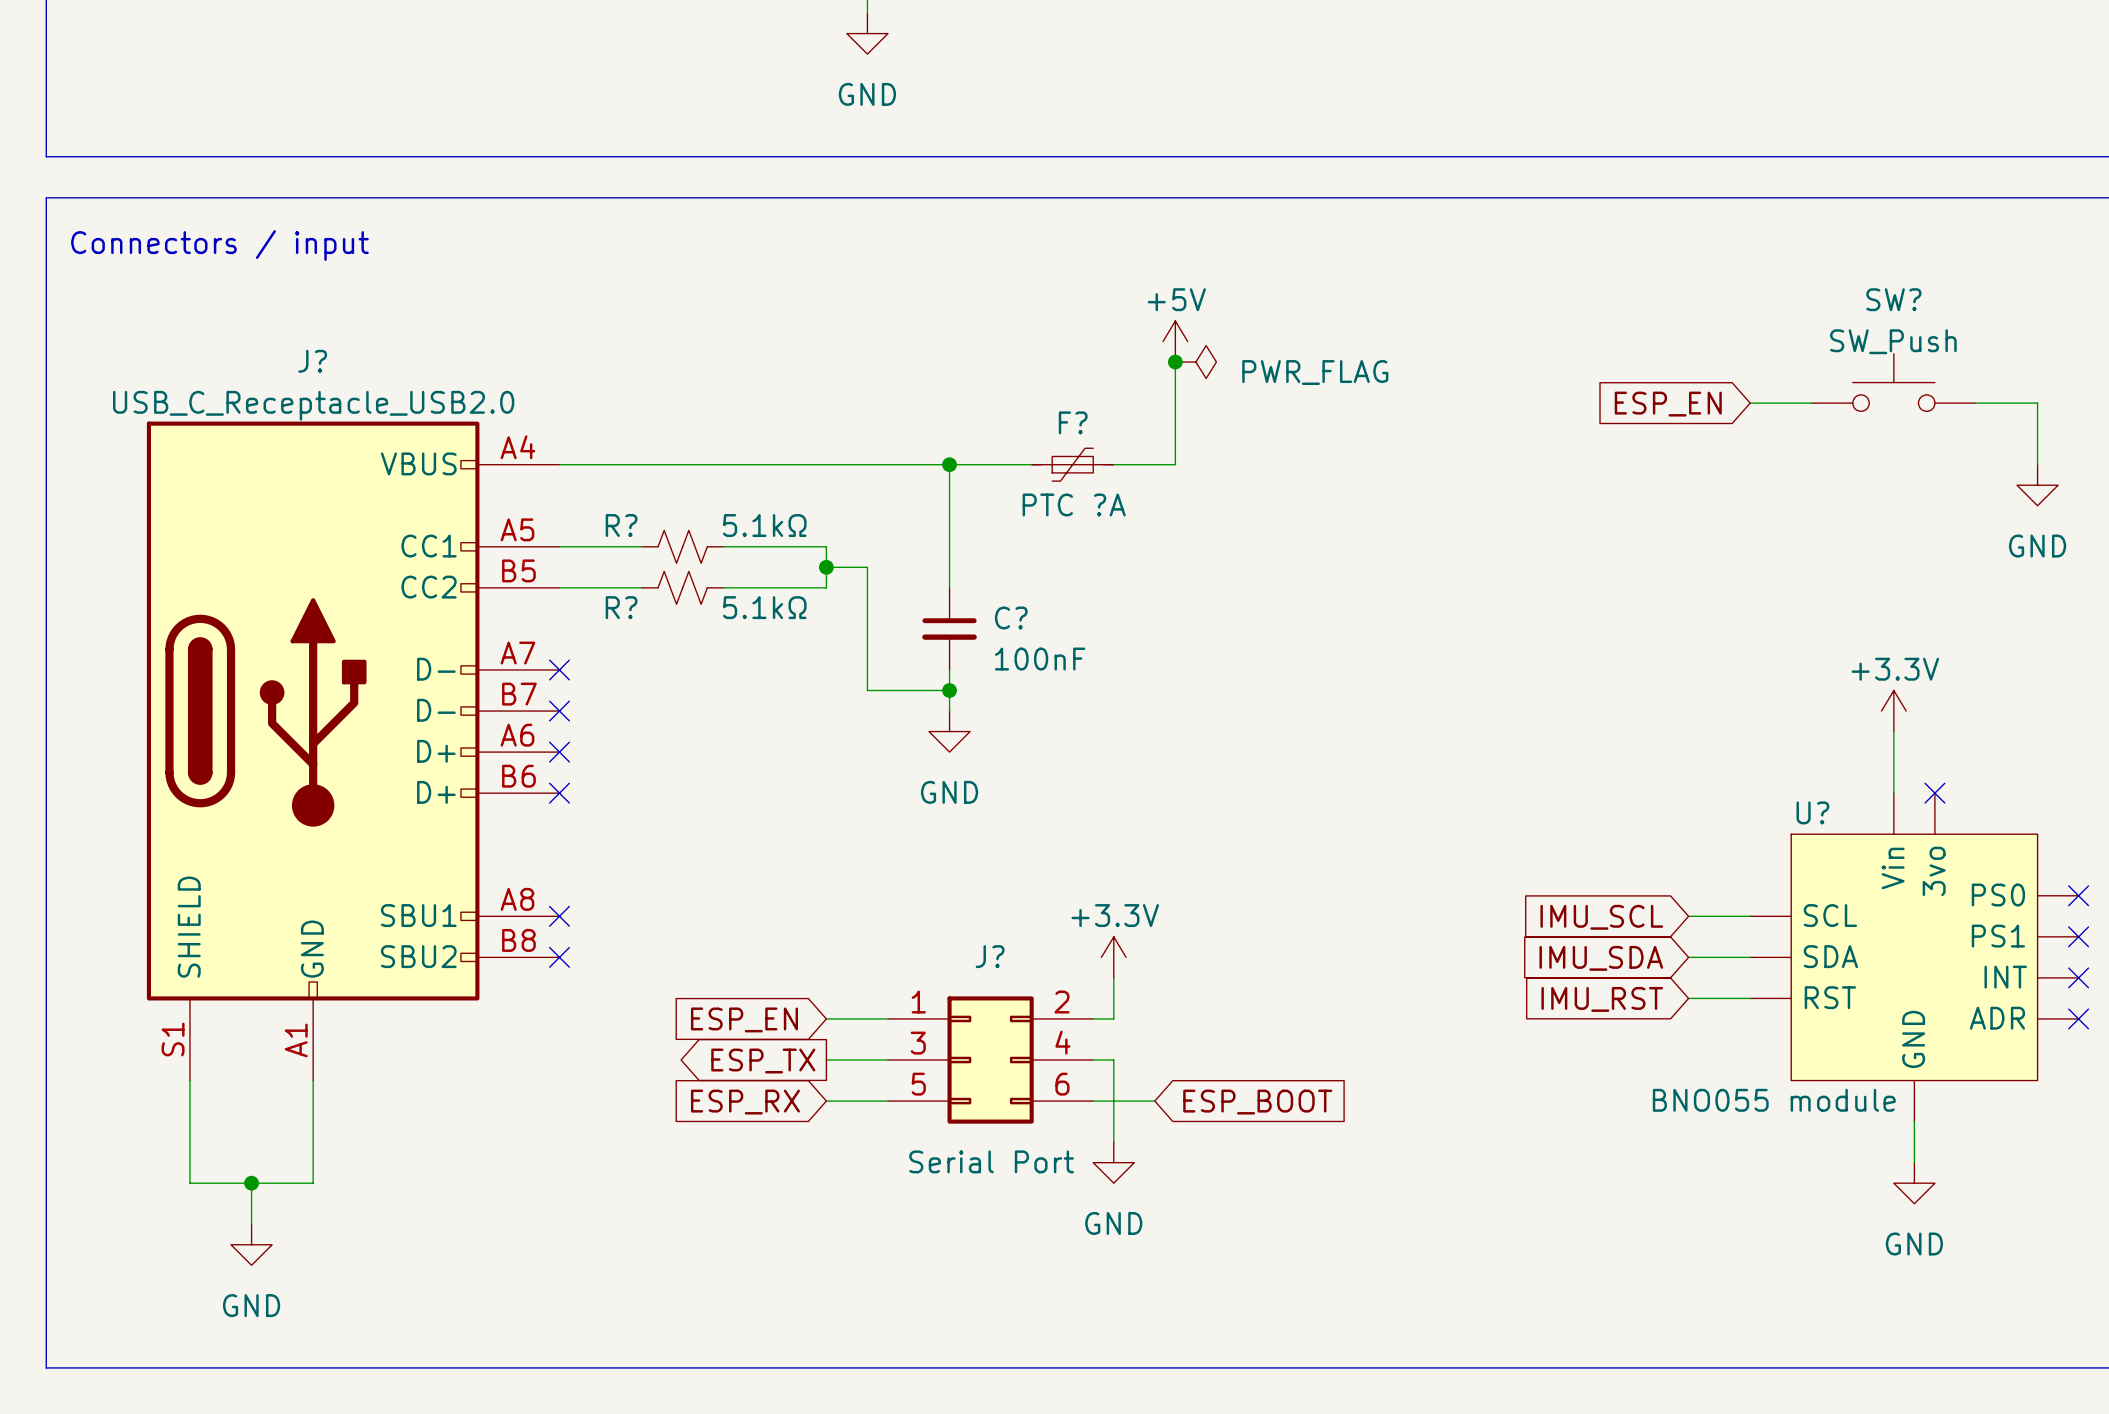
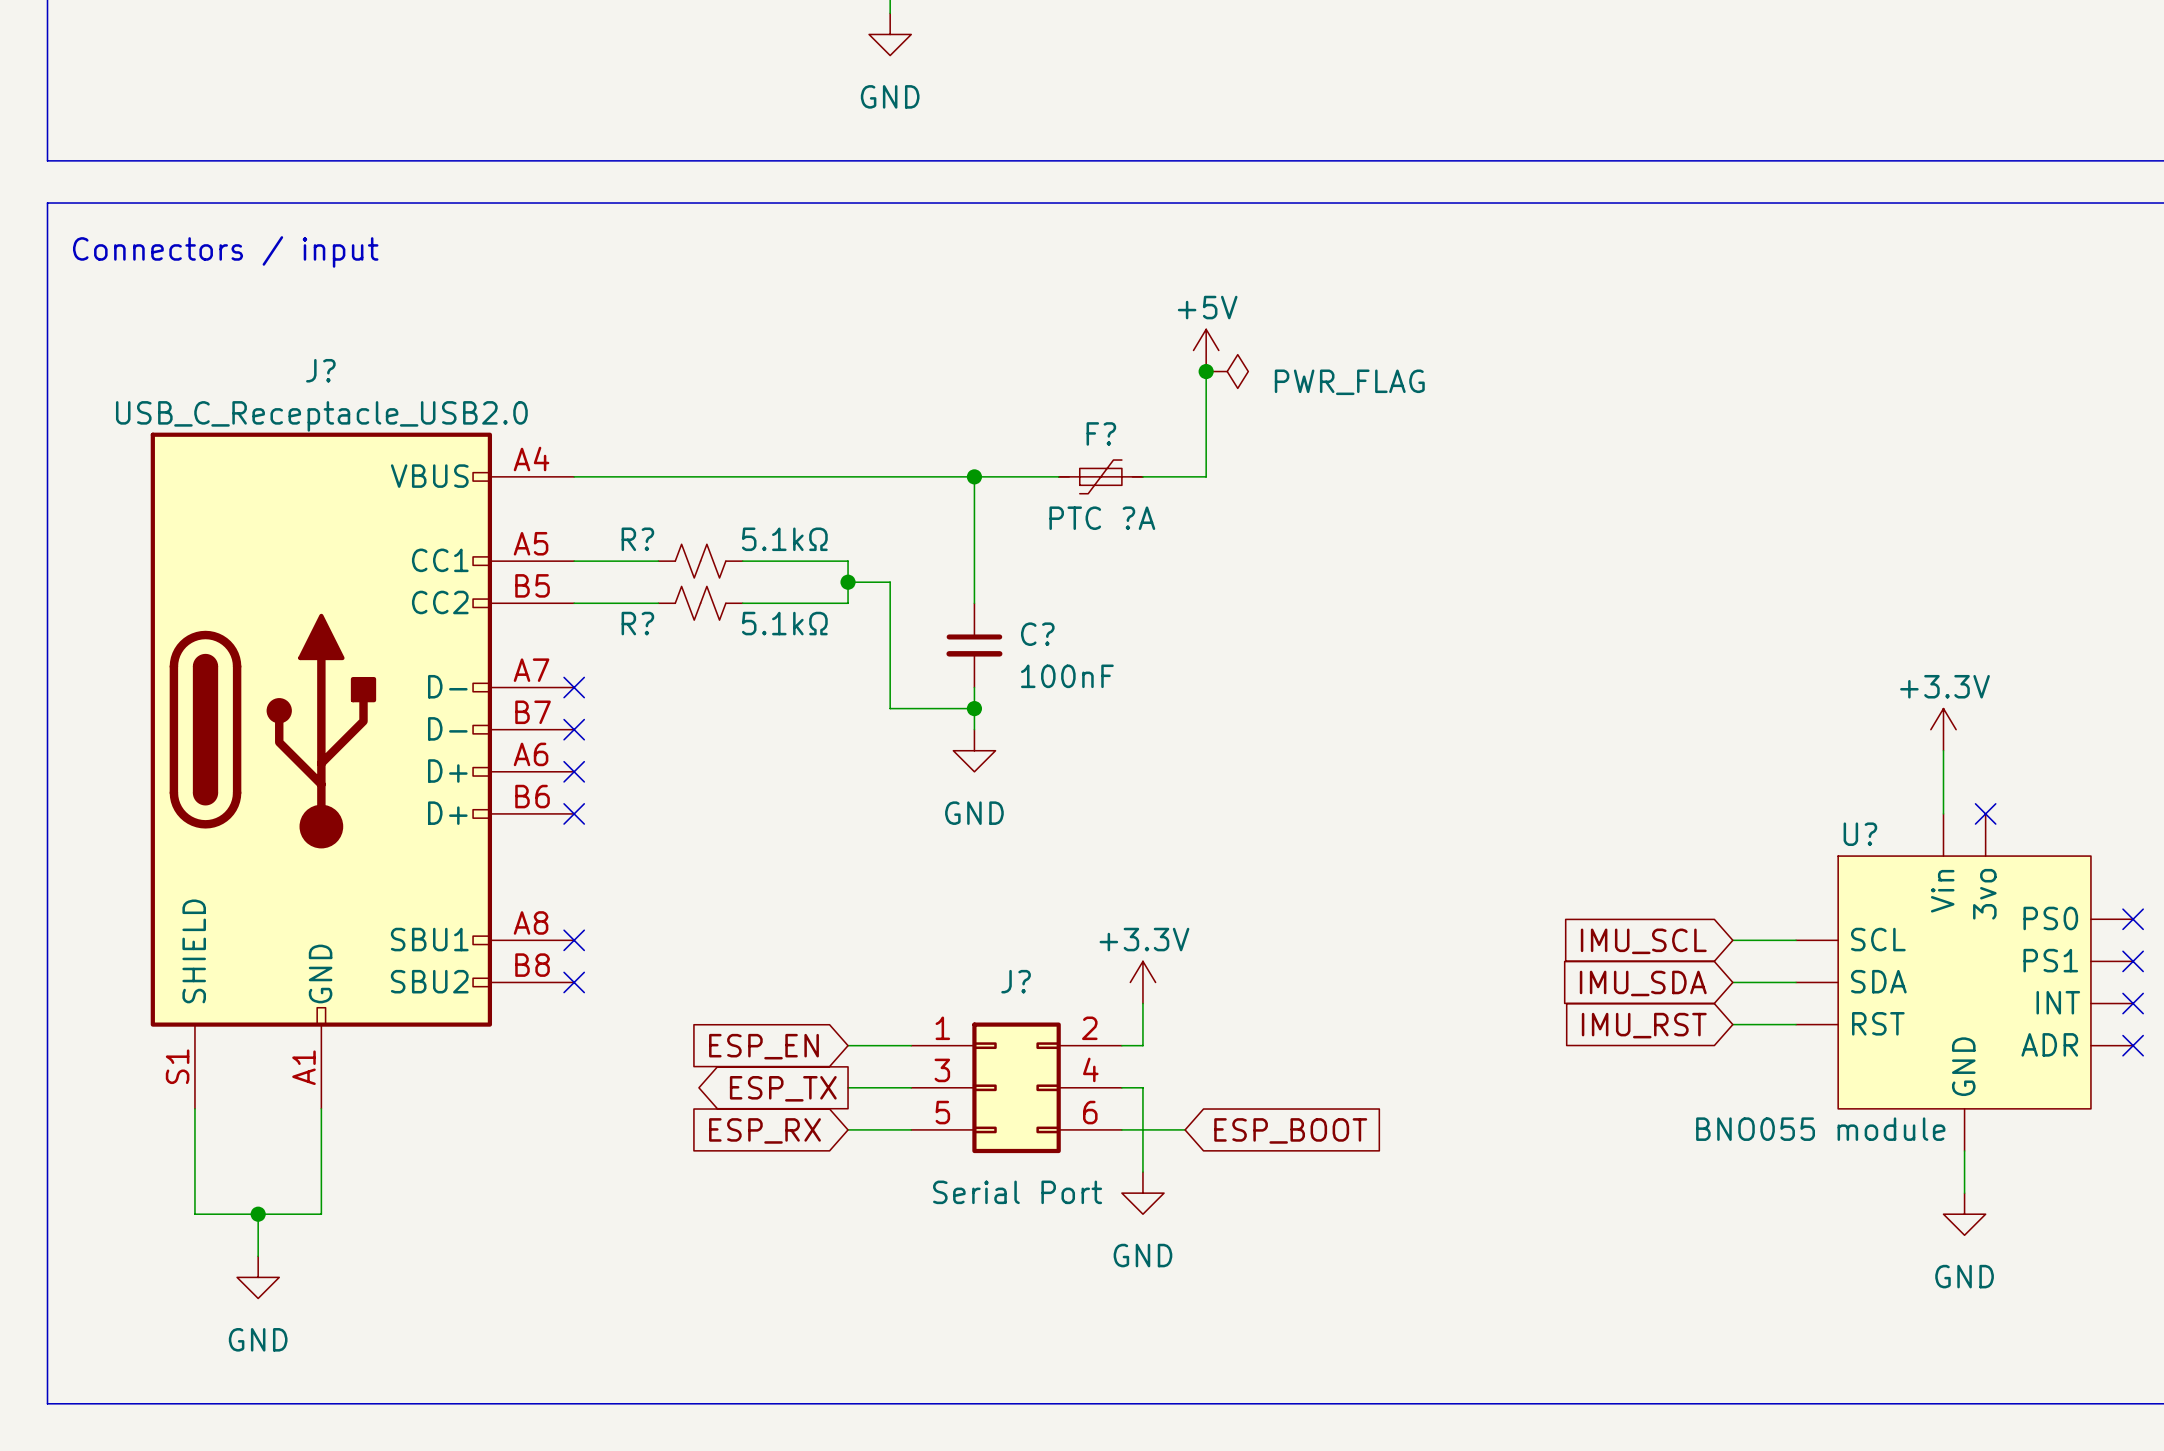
SW?: SW_Push (1893, 382) -> none
wire: (1750, 403) (1811, 403) -> none
wire: (1975, 403) (2037, 403) (2037, 464) -> none
global label: ESP_EN (1668, 404) -> none
power symbol: GND (2037, 485) -> none

